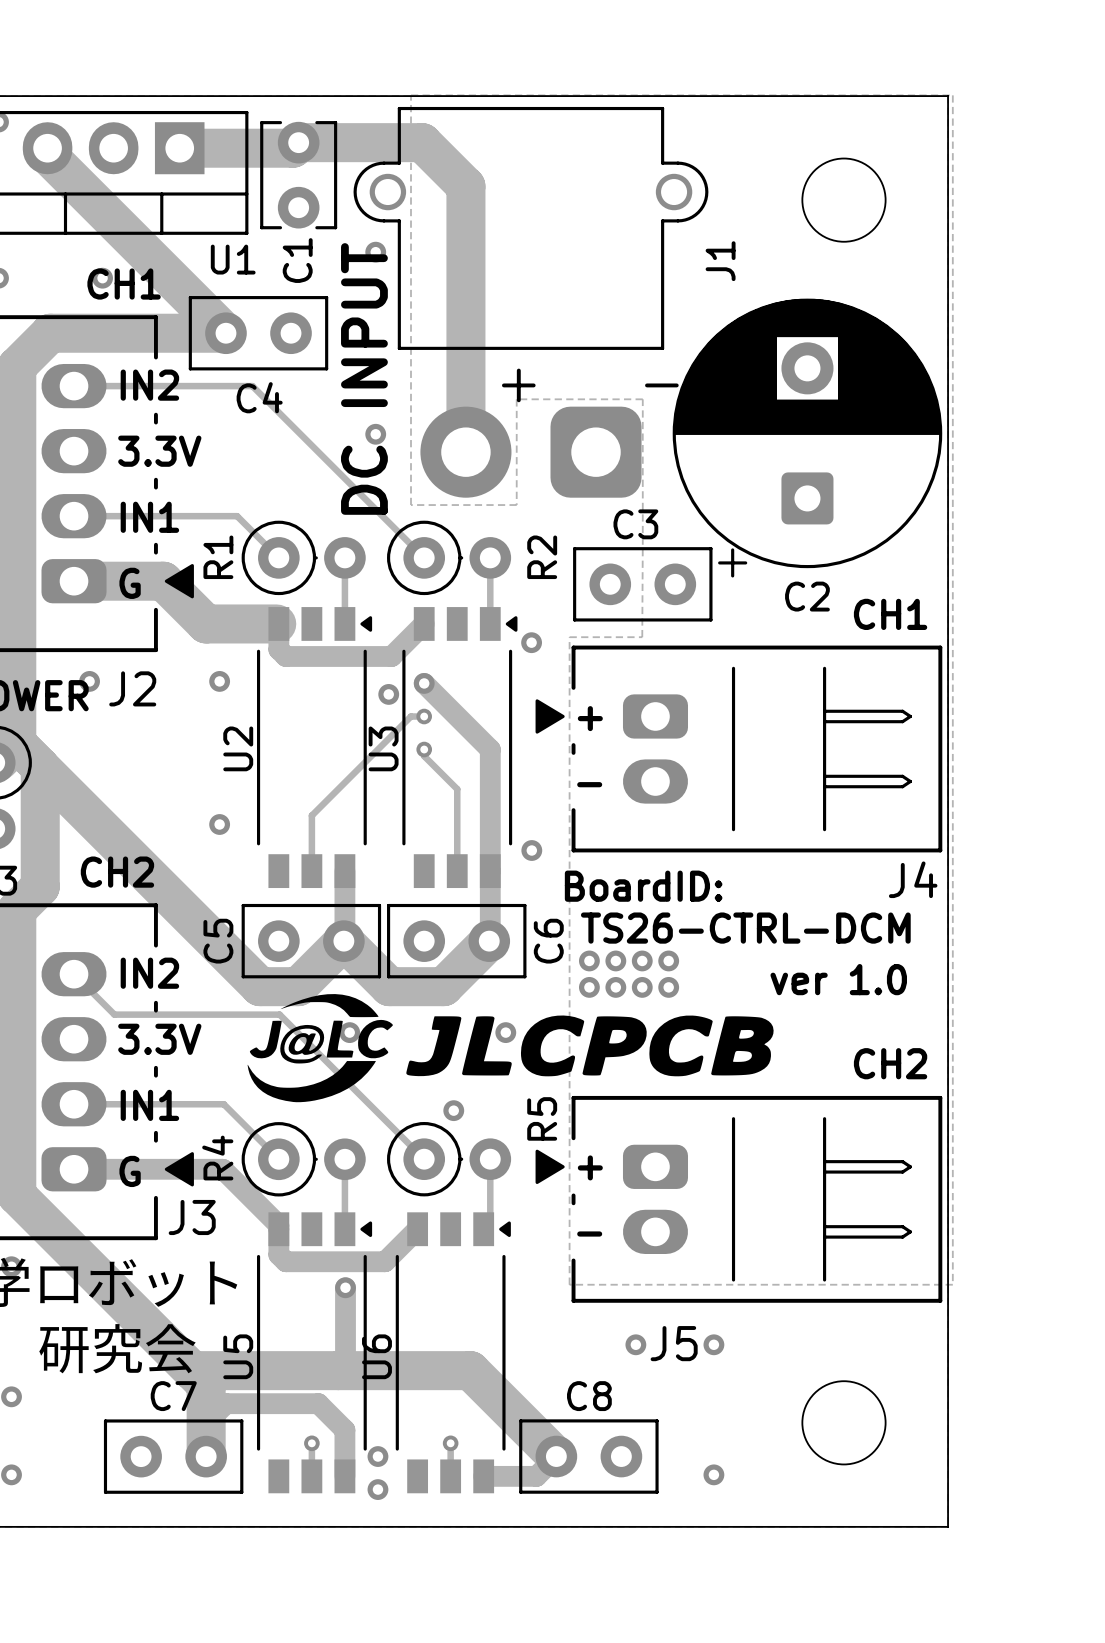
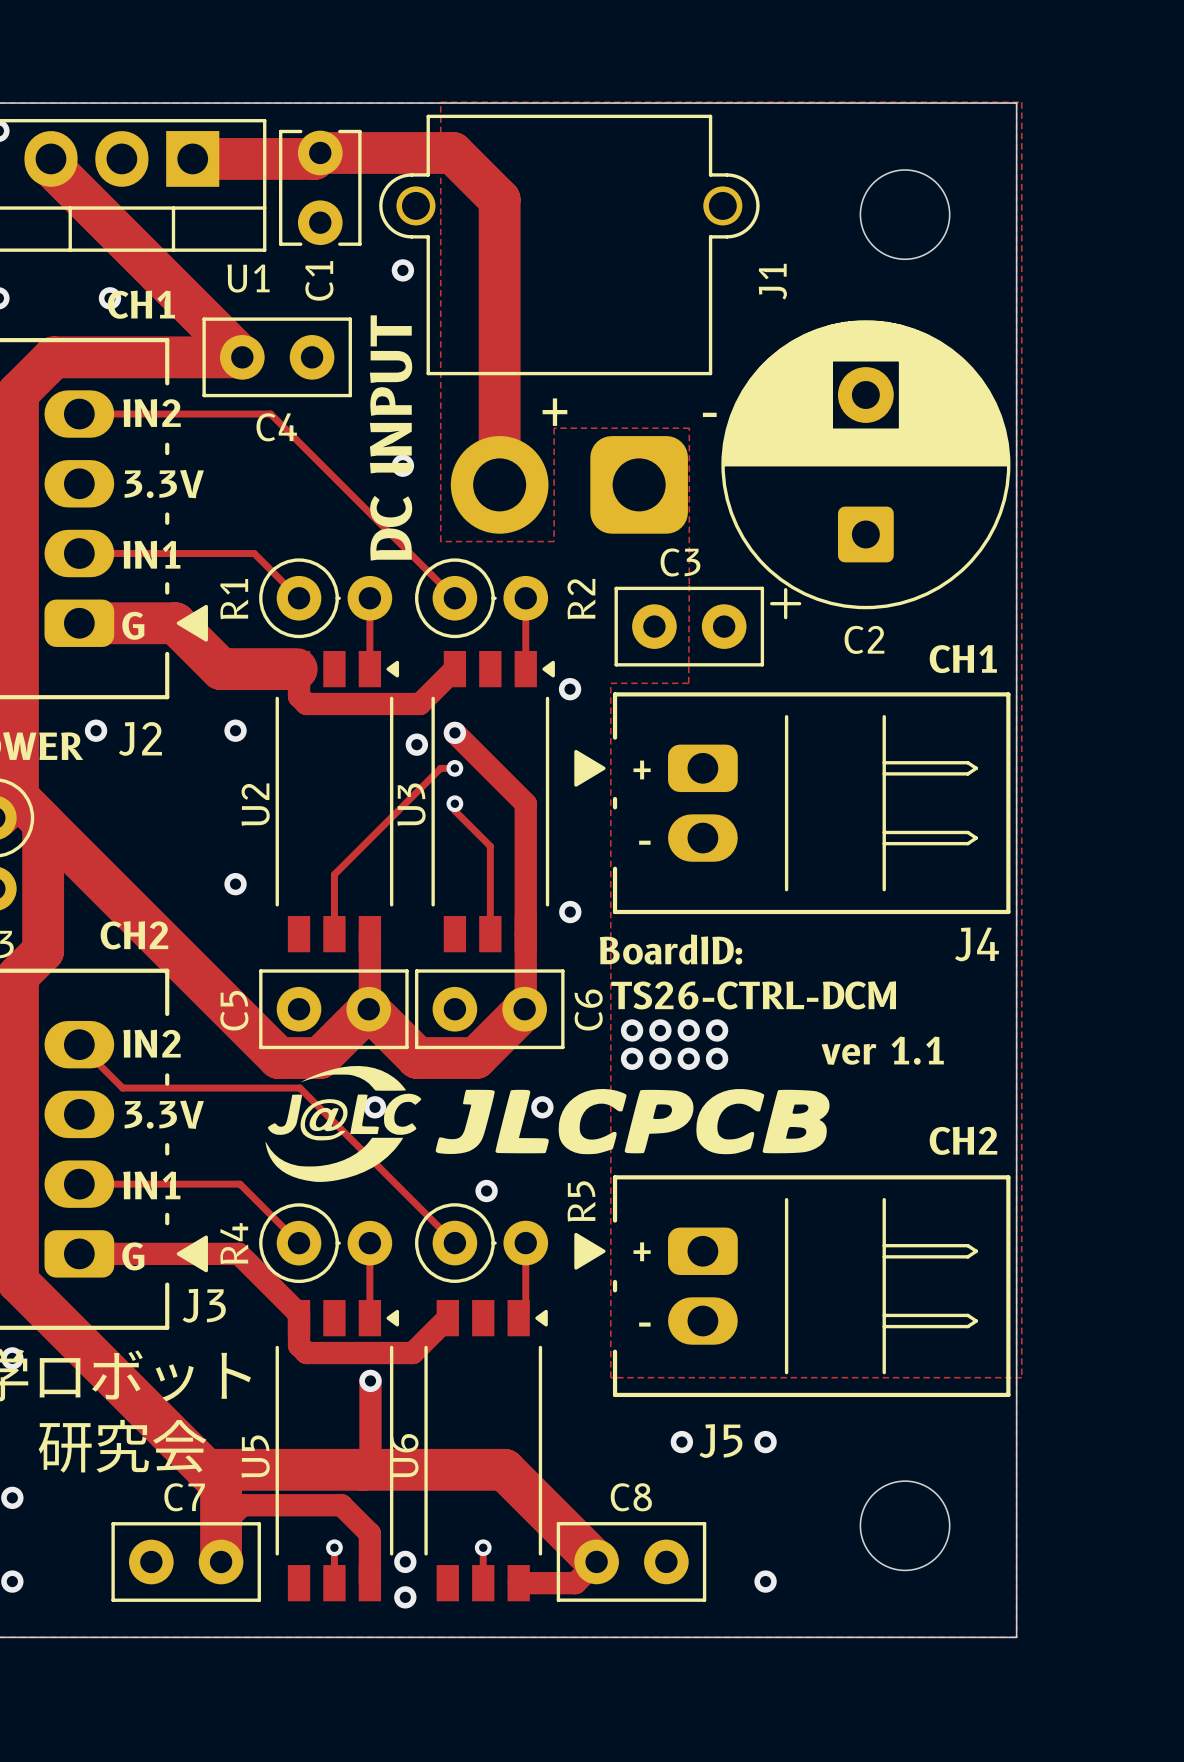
text: ver 1.0 (838, 979) -> ver 1.1 (882, 1050)

